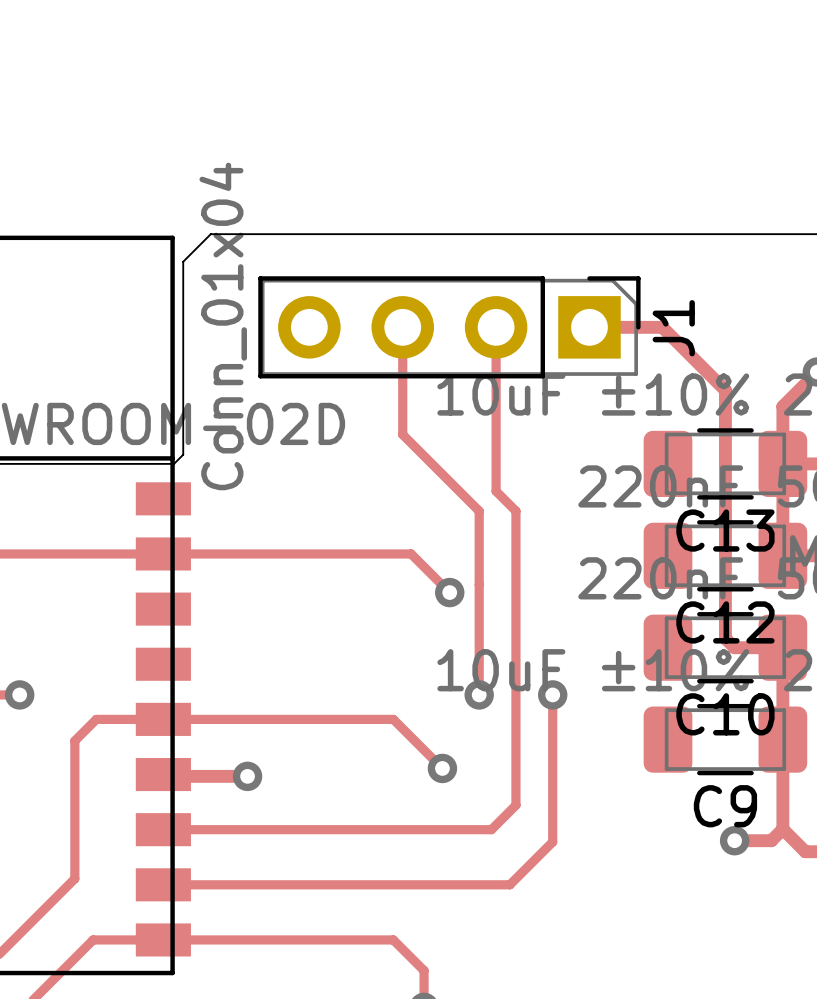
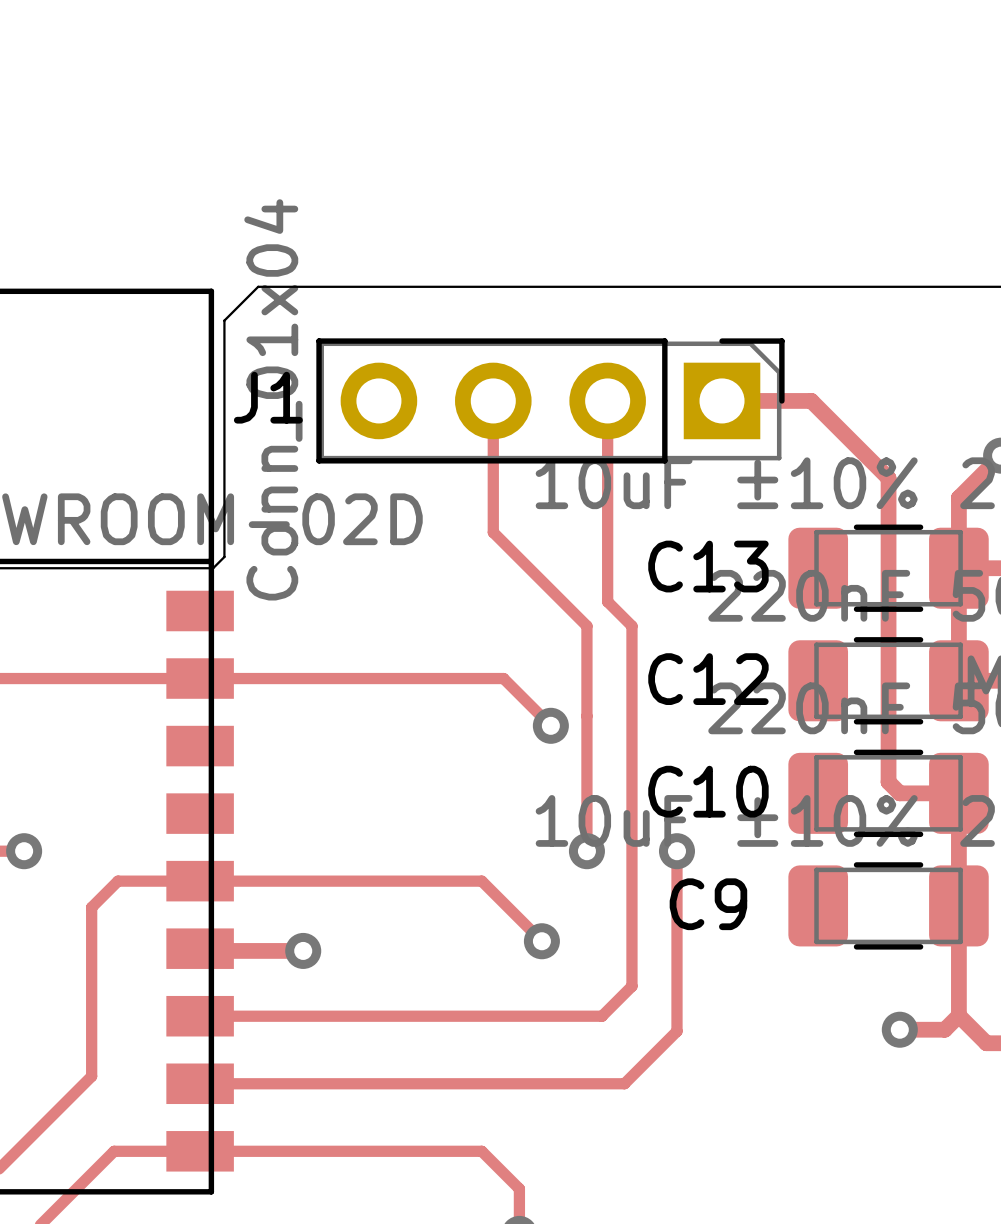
J1 name rotation: 0° (673, 328) -> 90° clockwise (268, 397)
J1 name position: J1 (673, 328) -> J1 (268, 397)
C13 name position: C13 (725, 530) -> C13 (708, 566)
C12 name position: C12 (725, 622) -> C12 (708, 679)
C10 name position: C10 (725, 714) -> C10 (708, 791)
C9 name position: C9 (725, 806) -> C9 (708, 904)

